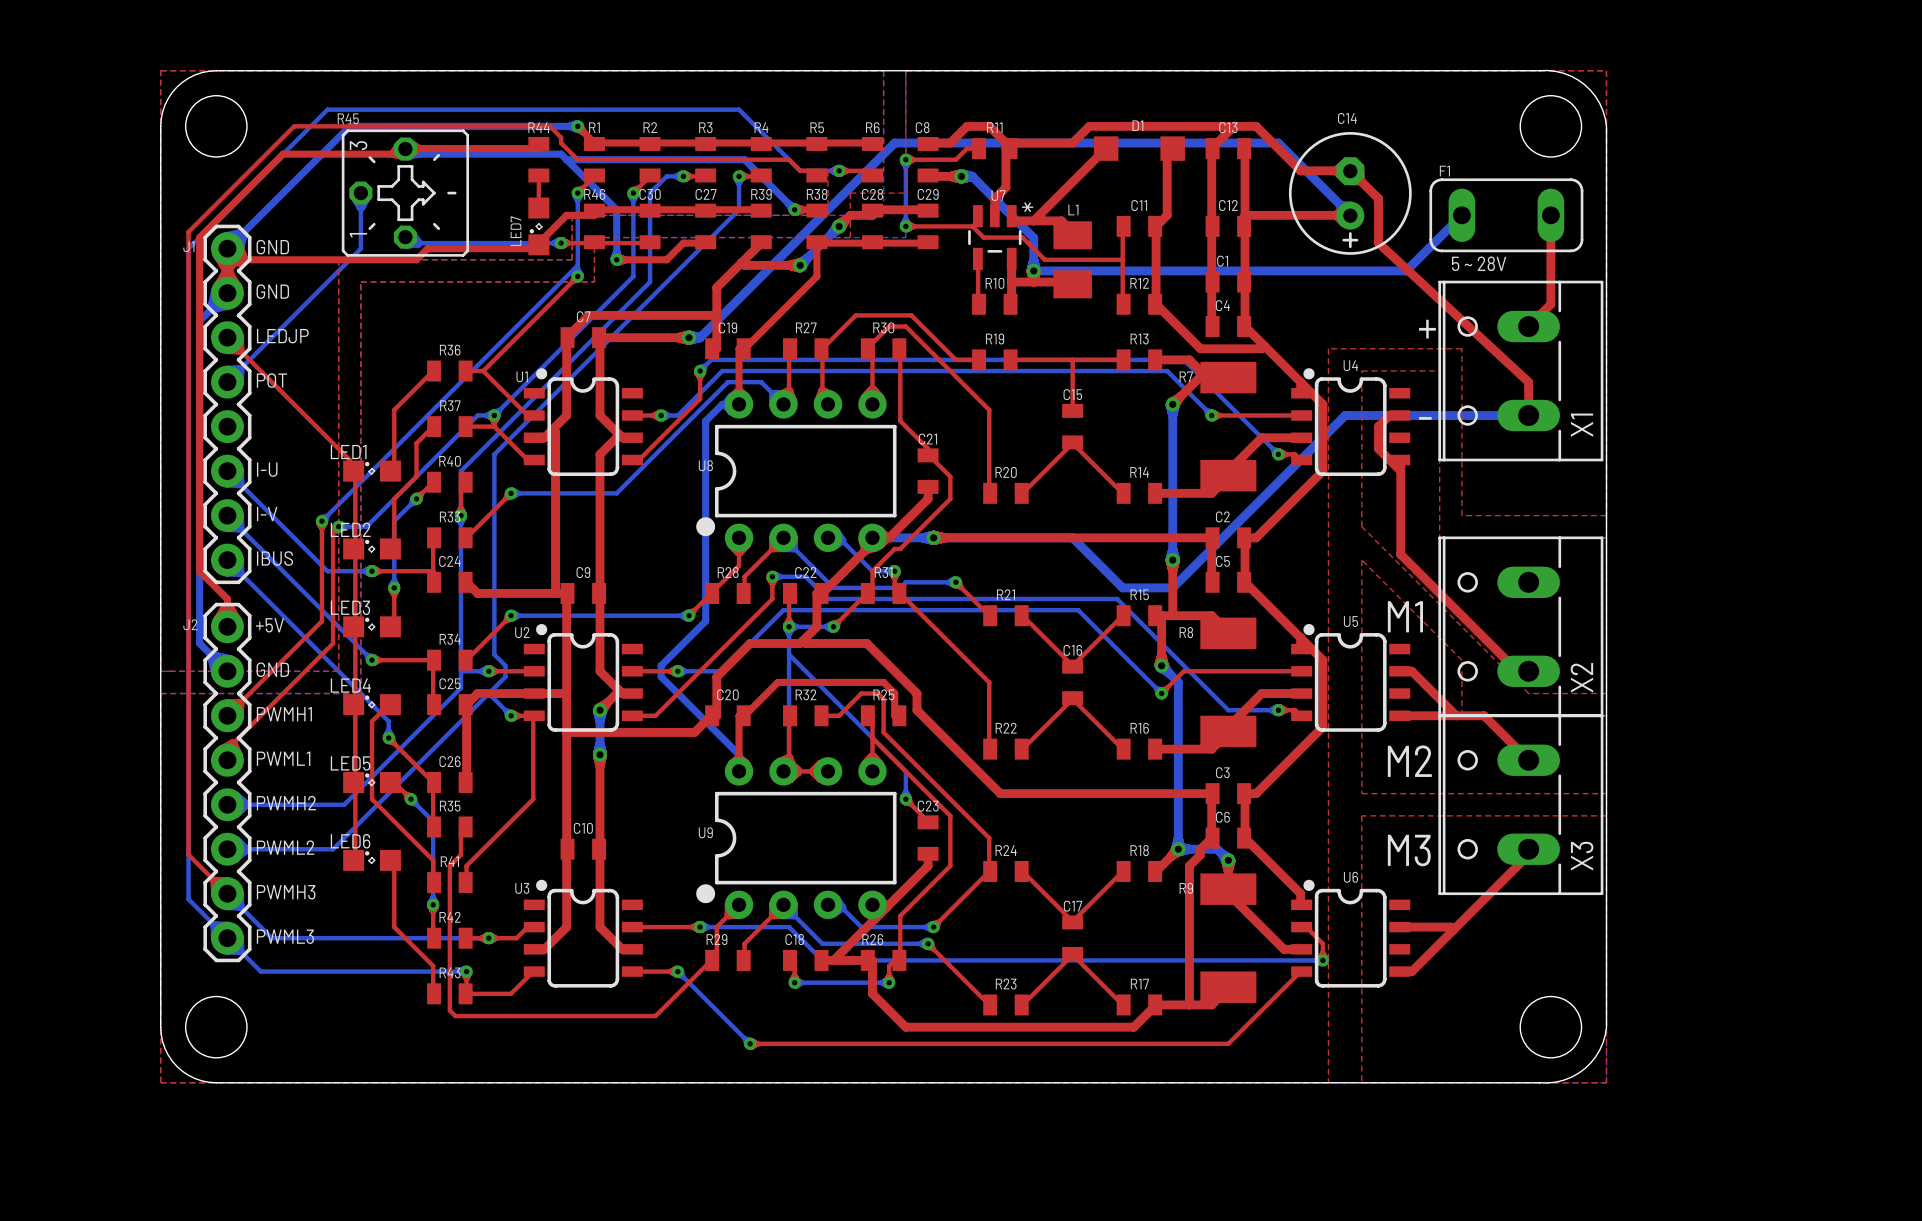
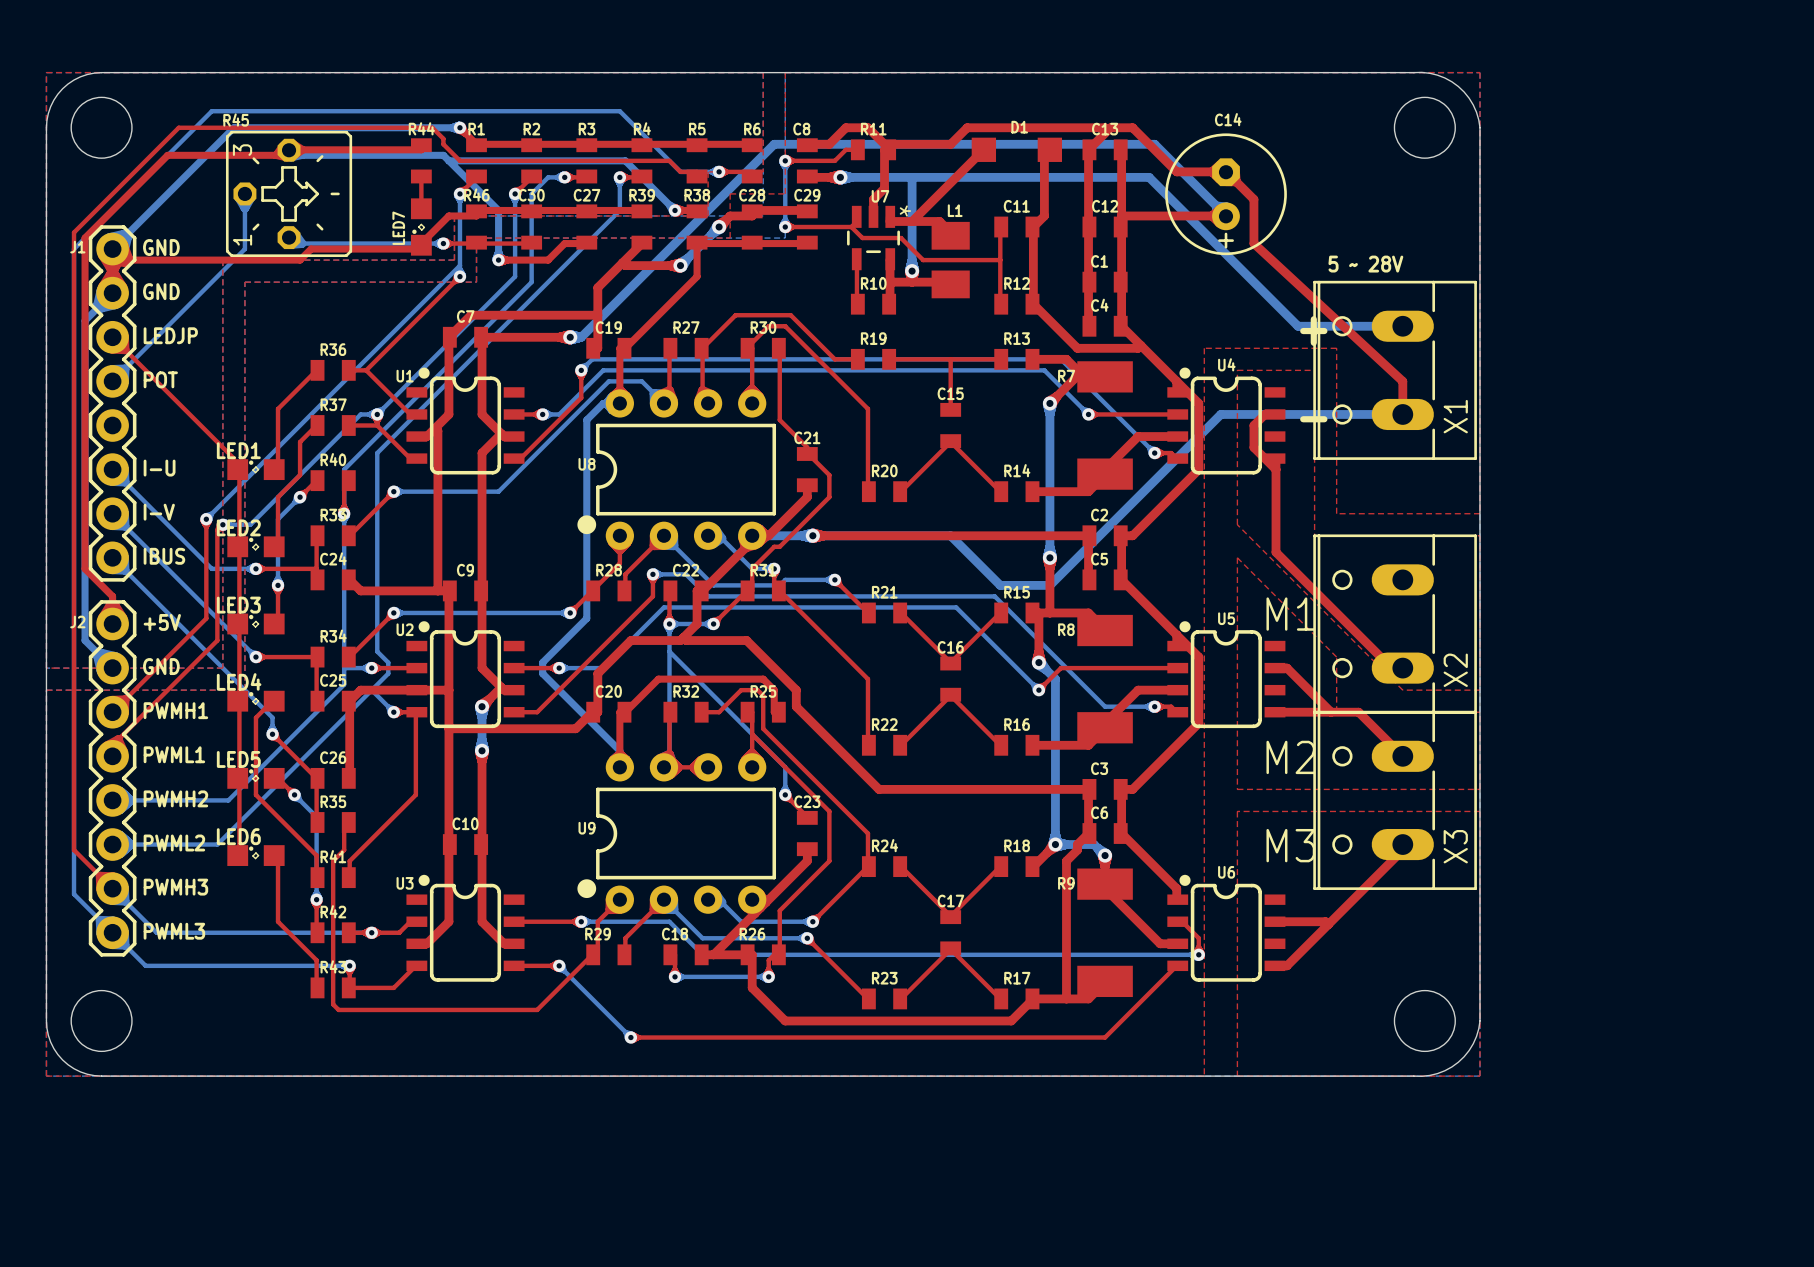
bottom track: (972, 176) (1033, 238) -> (912, 177) (912, 238)
bottom track: none -> (851, 177) (1149, 177) (1298, 326) (1402, 326)
bottom track: (1461, 215) (1406, 270) (1033, 270) -> none
F1: (1506, 215) -> none
top track: (1550, 215) (1550, 304) (1528, 326) -> none

